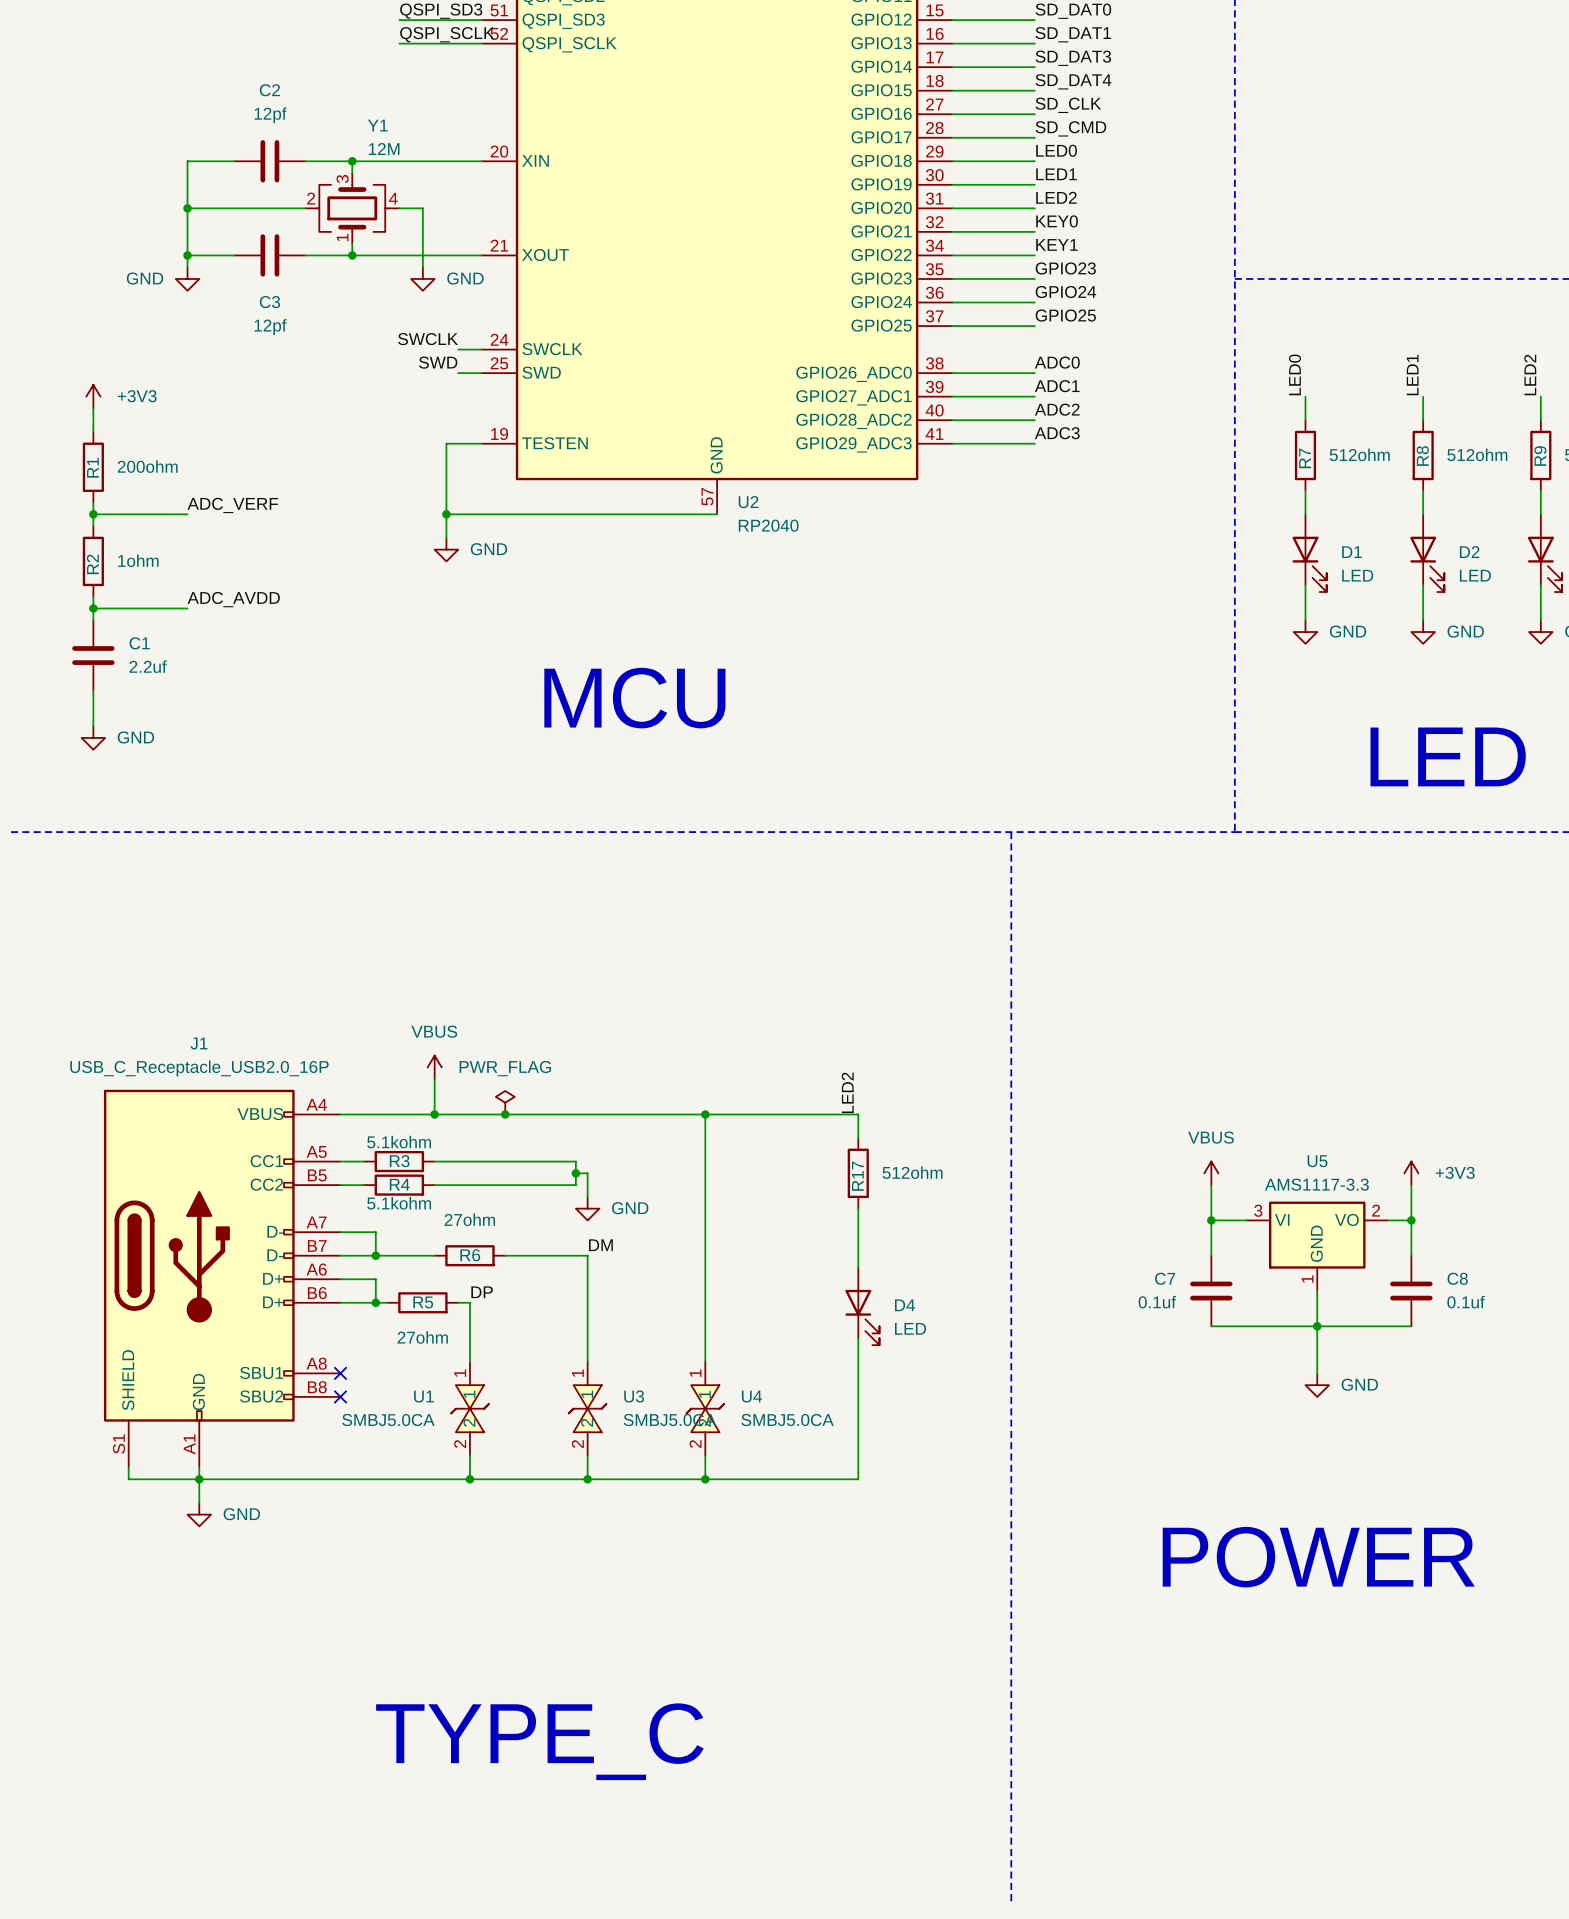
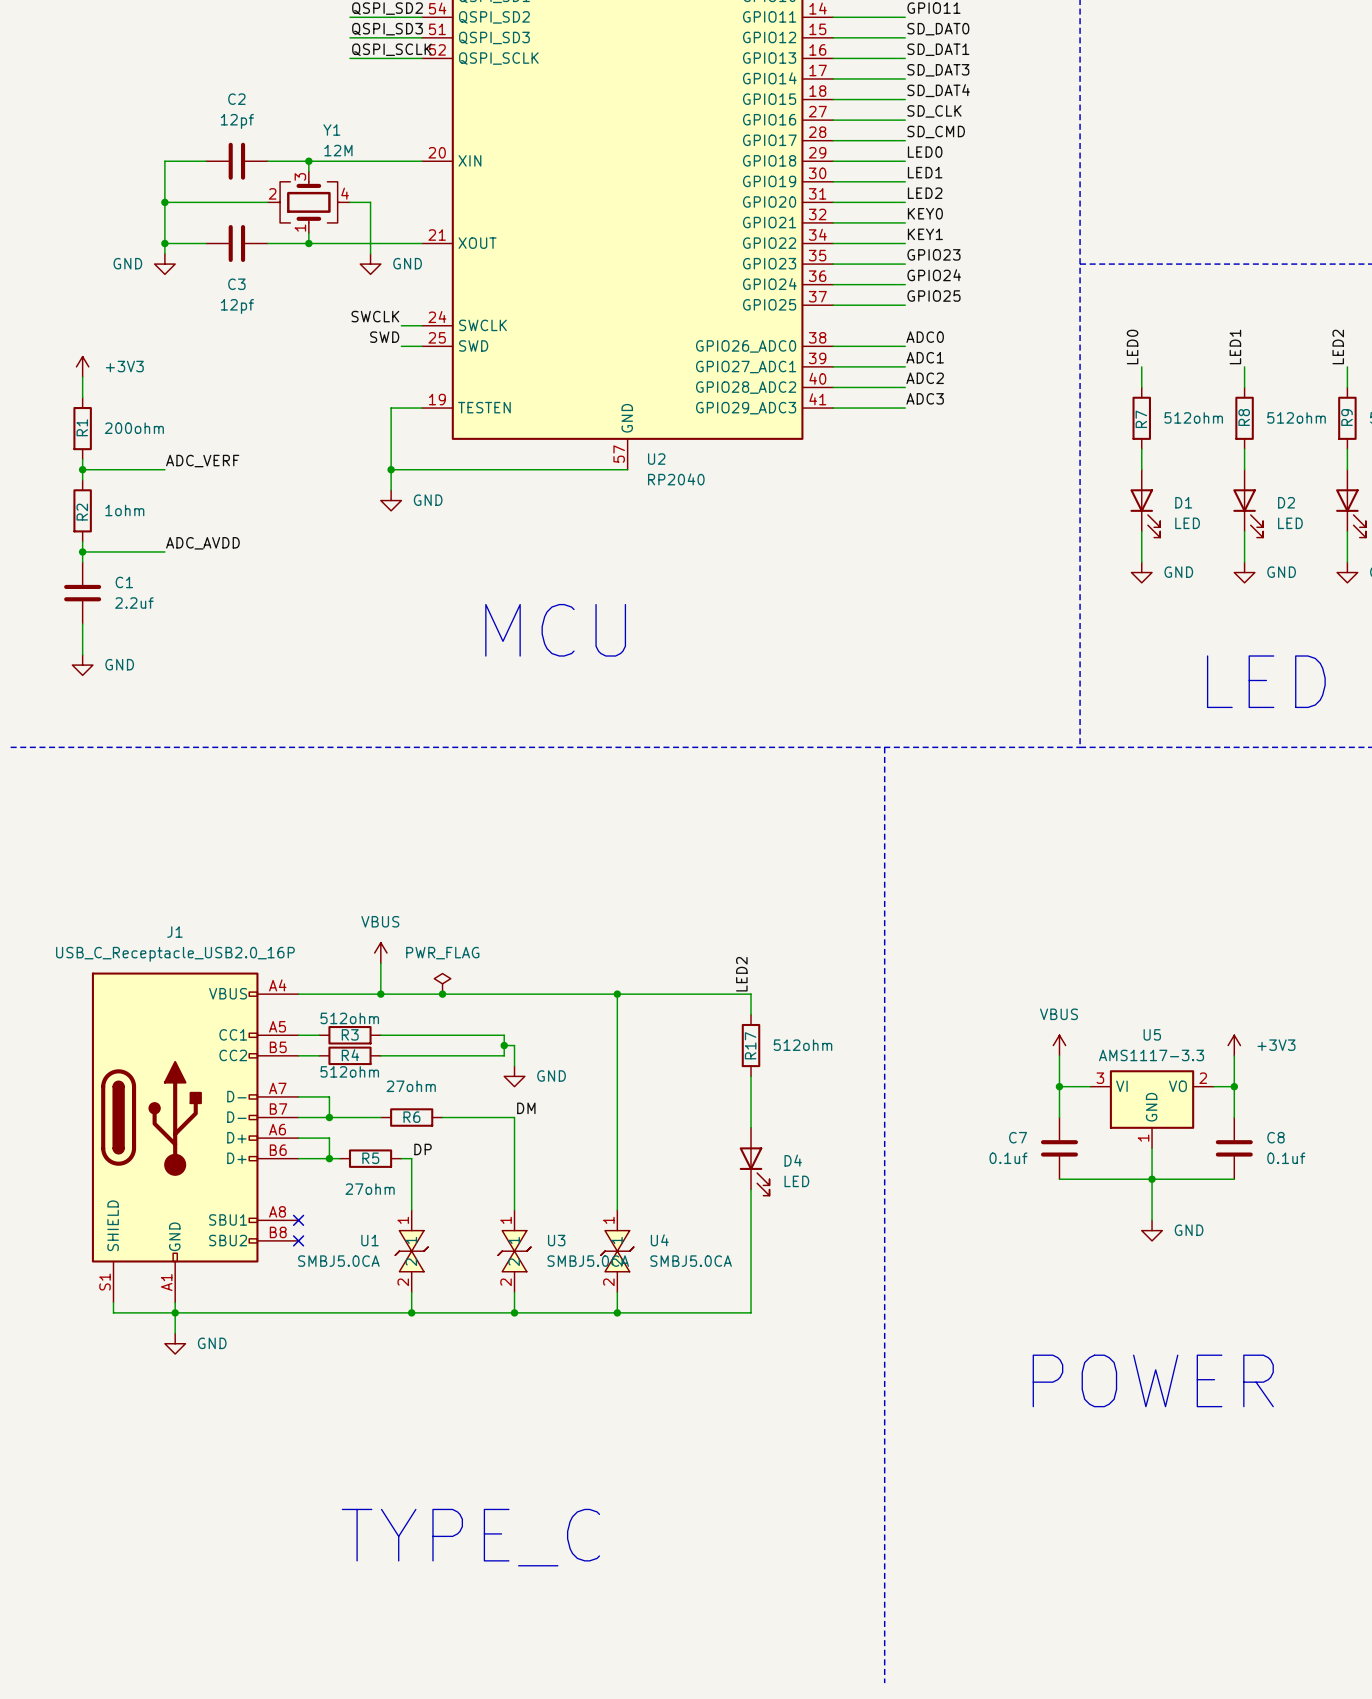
R3 value: 5.1kohm (399, 1142) -> 512ohm (349, 1018)
R4 value: 5.1kohm (399, 1203) -> 512ohm (349, 1071)

